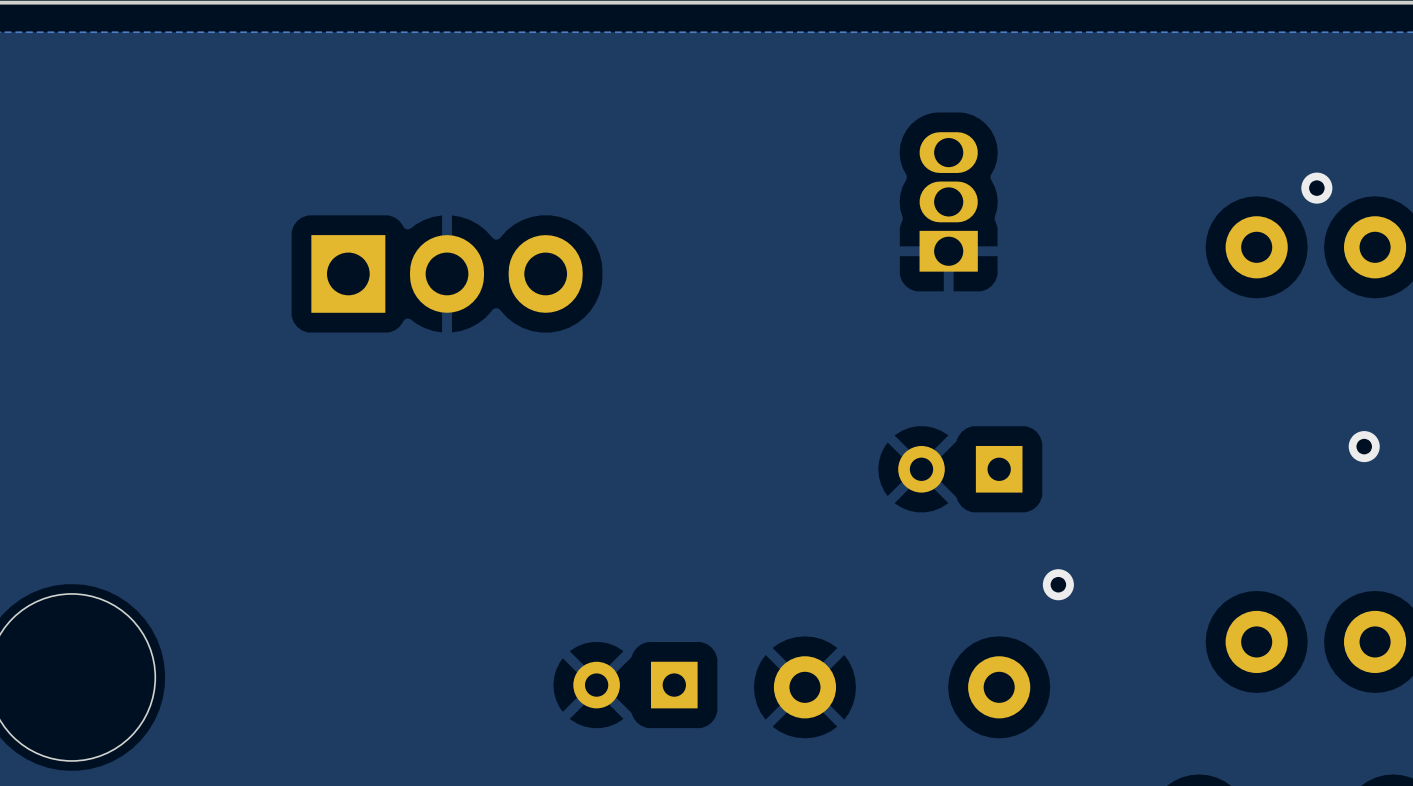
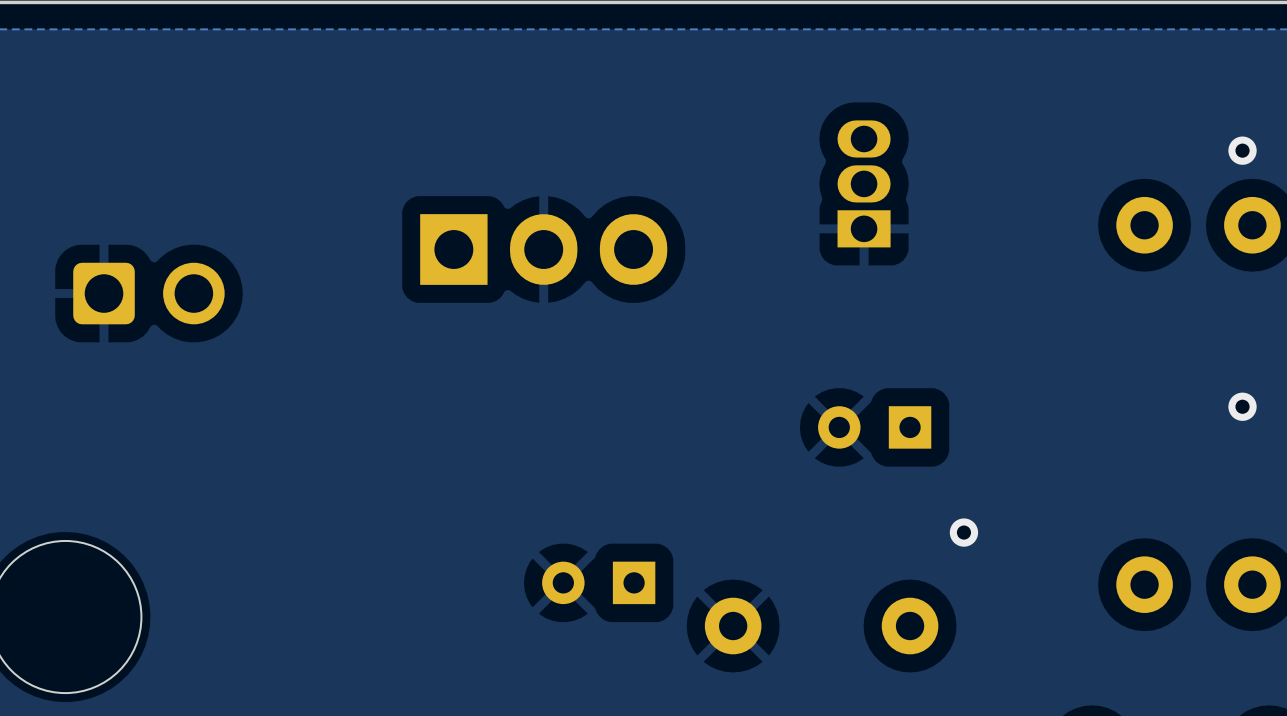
via position: (1316, 188) -> (1242, 150)
part position: (447, 273) -> (543, 249)
part: none -> (148, 293)
part position: (635, 685) -> (598, 582)

